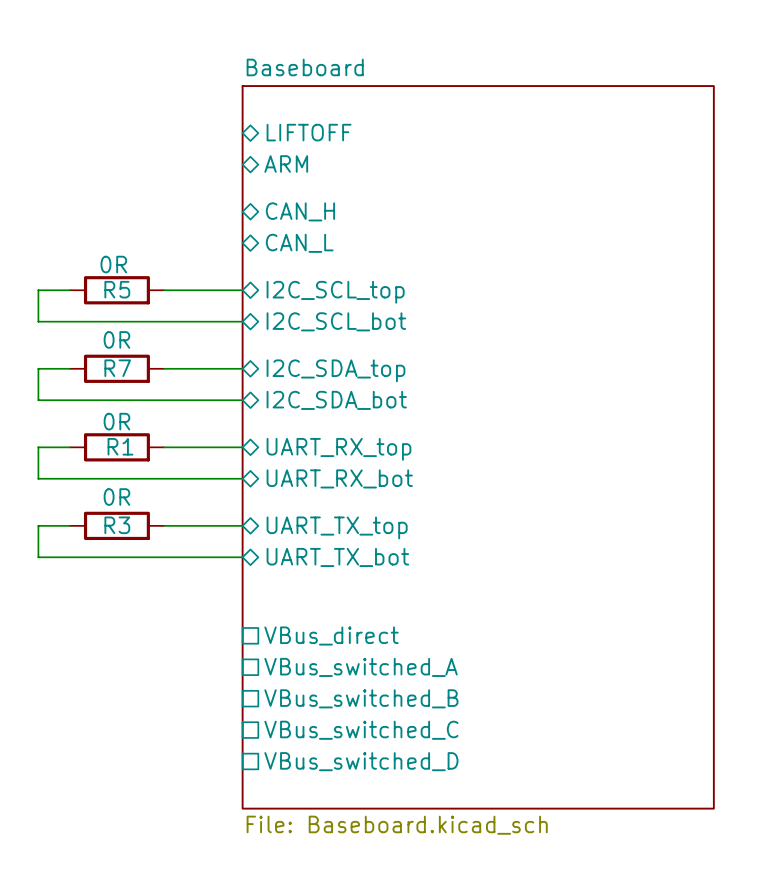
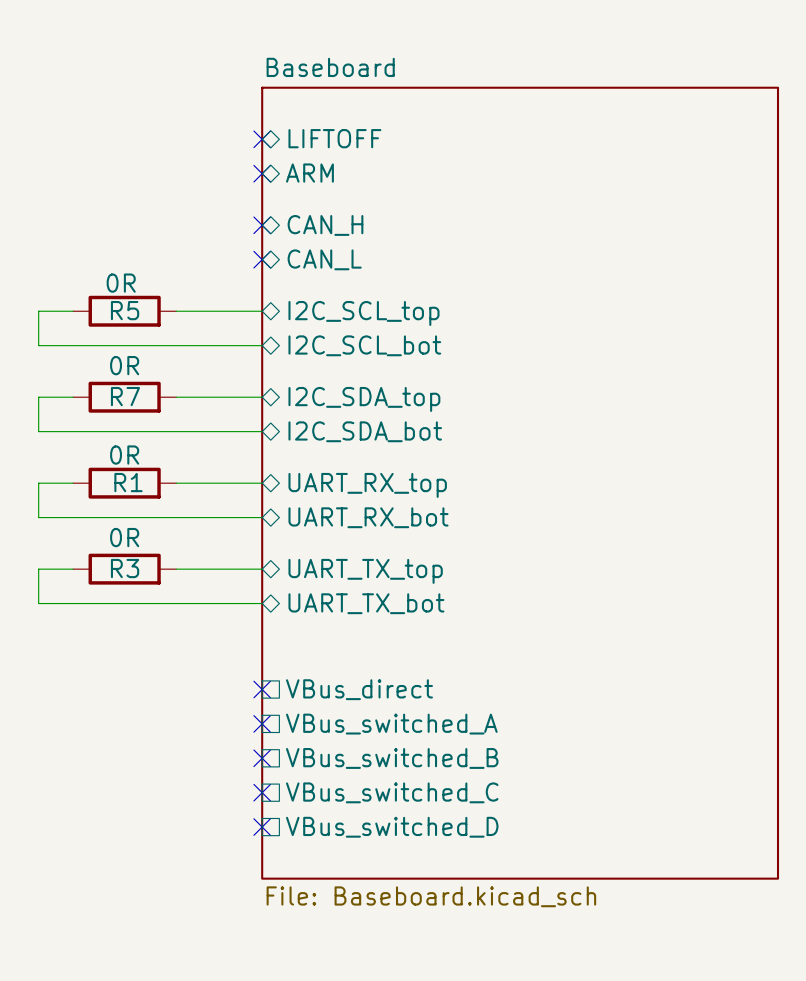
no-connect mark: none -> (262, 139)
no-connect mark: none -> (262, 173)
no-connect mark: none -> (262, 225)
no-connect mark: none -> (262, 259)
no-connect mark: none -> (262, 689)
no-connect mark: none -> (262, 723)
no-connect mark: none -> (262, 758)
no-connect mark: none -> (262, 792)
no-connect mark: none -> (262, 827)

